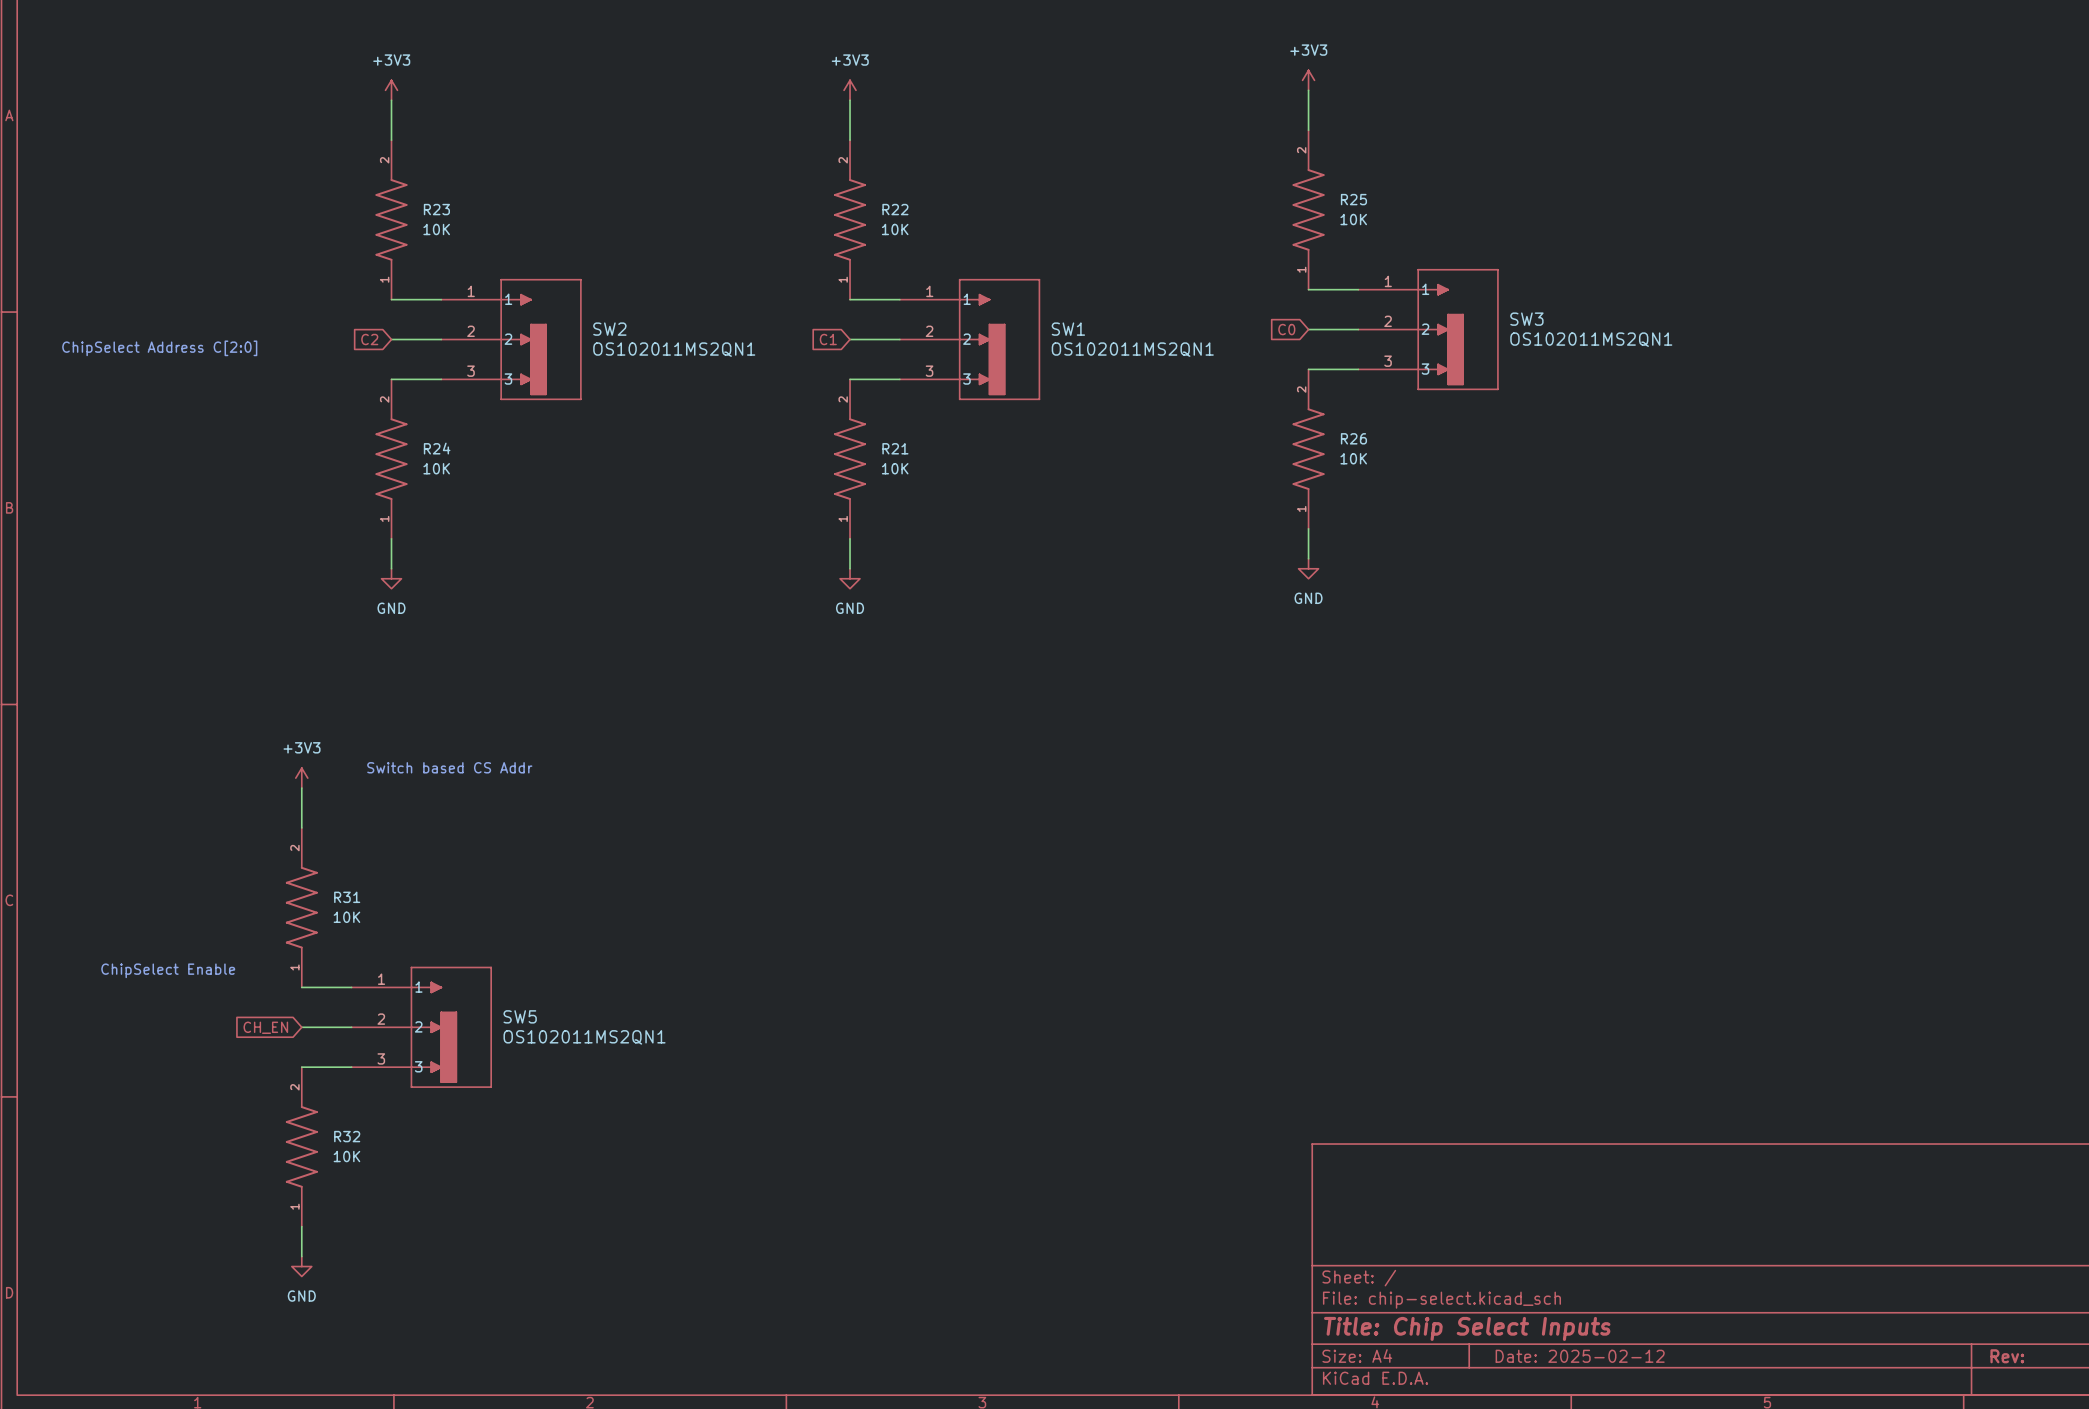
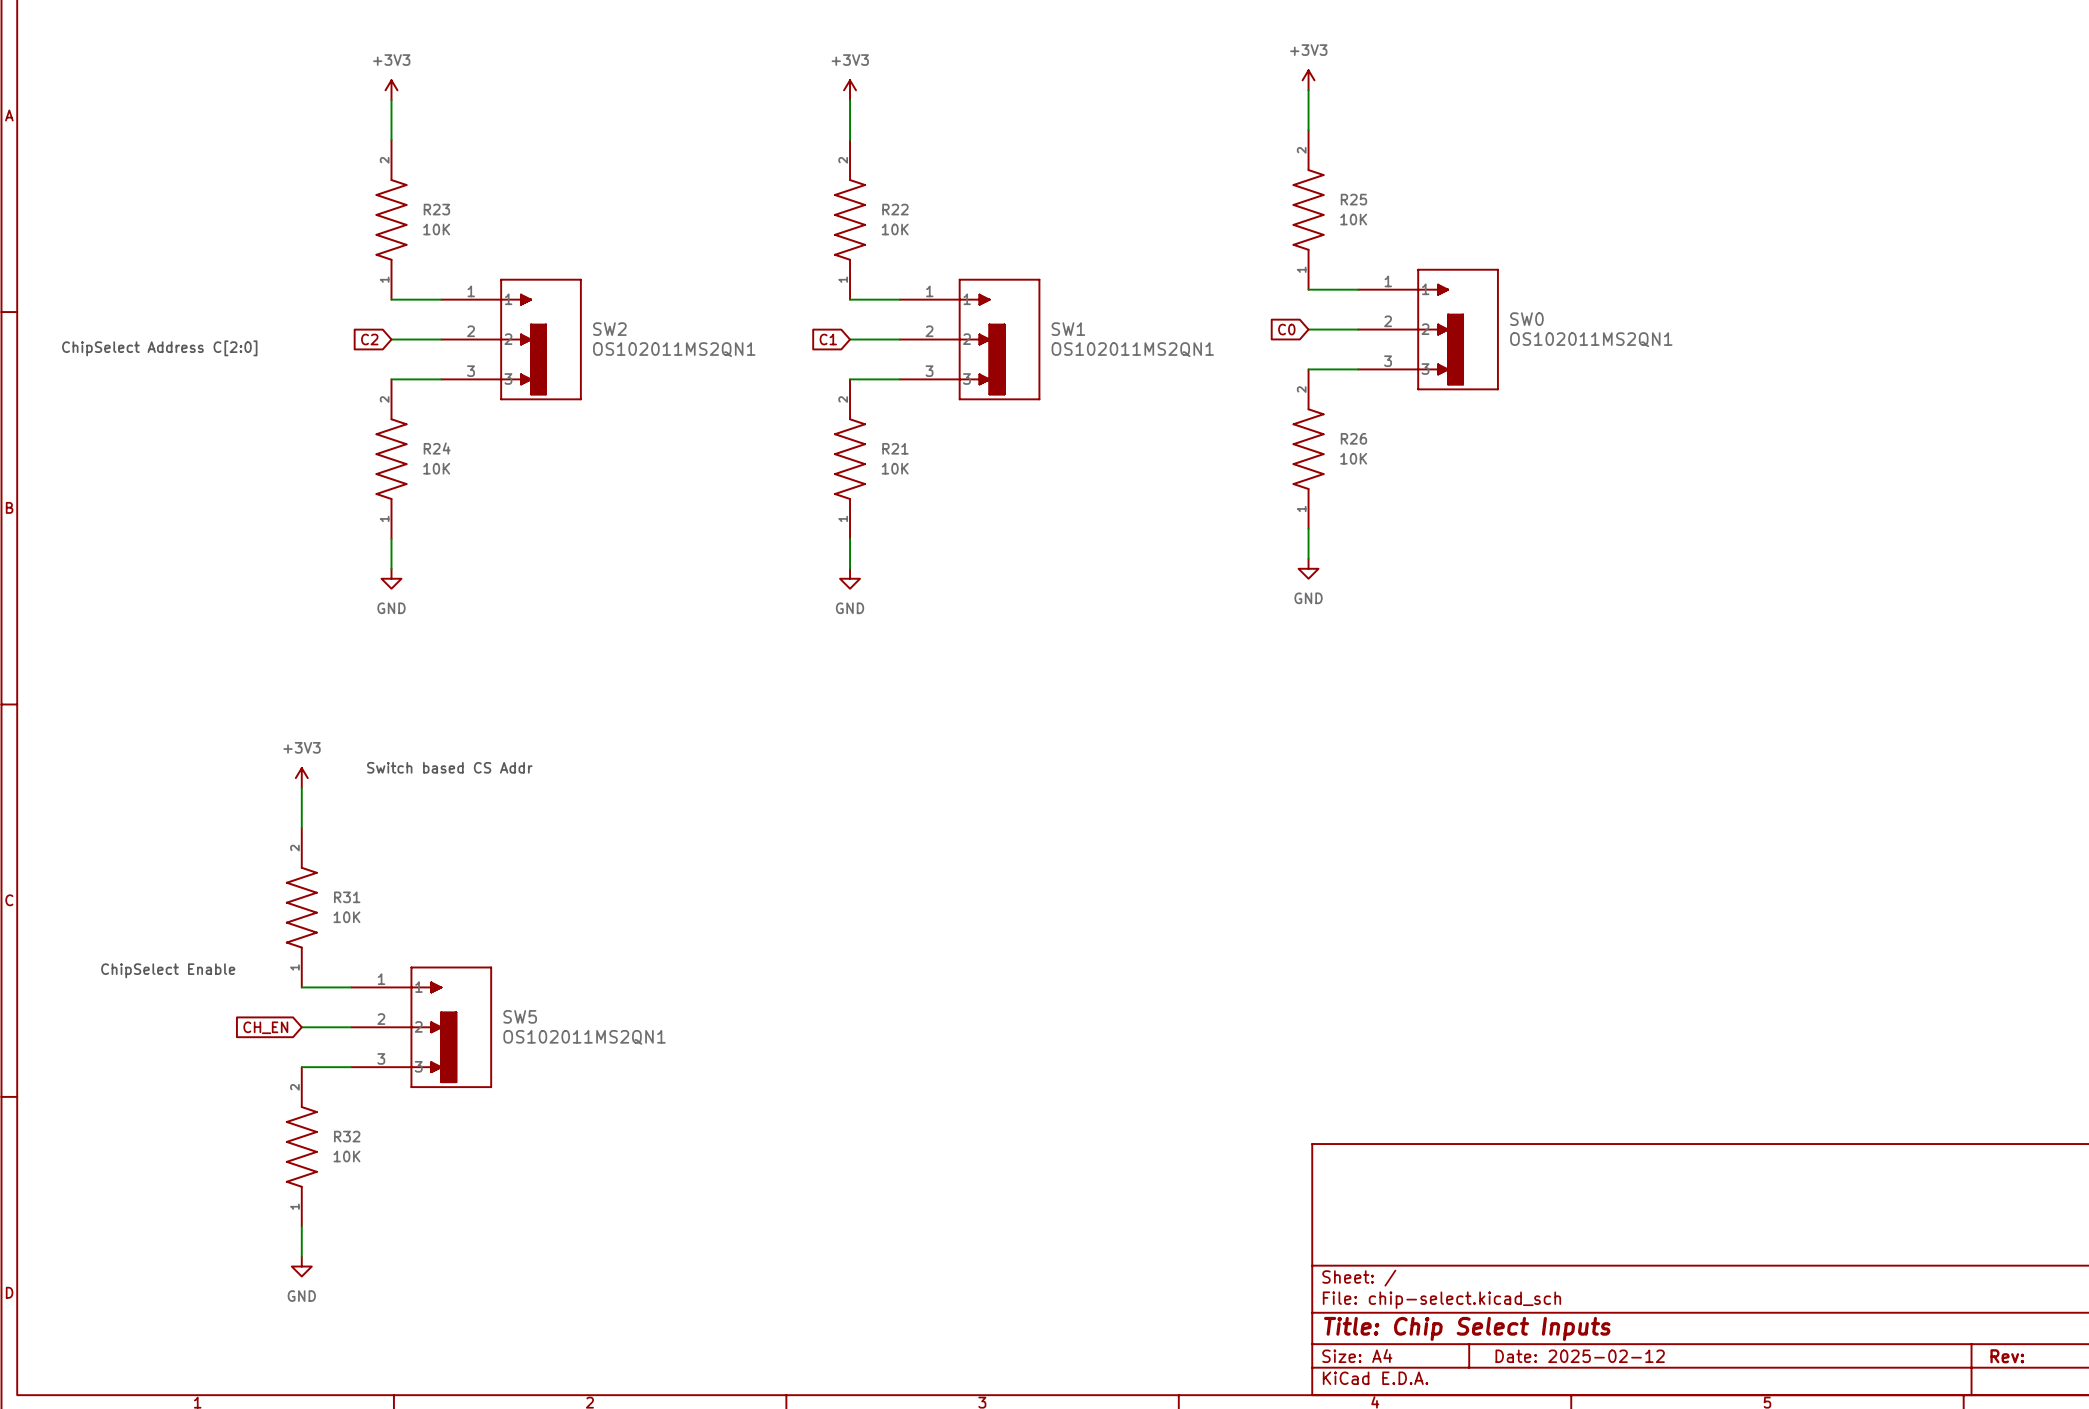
SW3 name: SW3 (1526, 319) -> SW0 (1526, 319)

